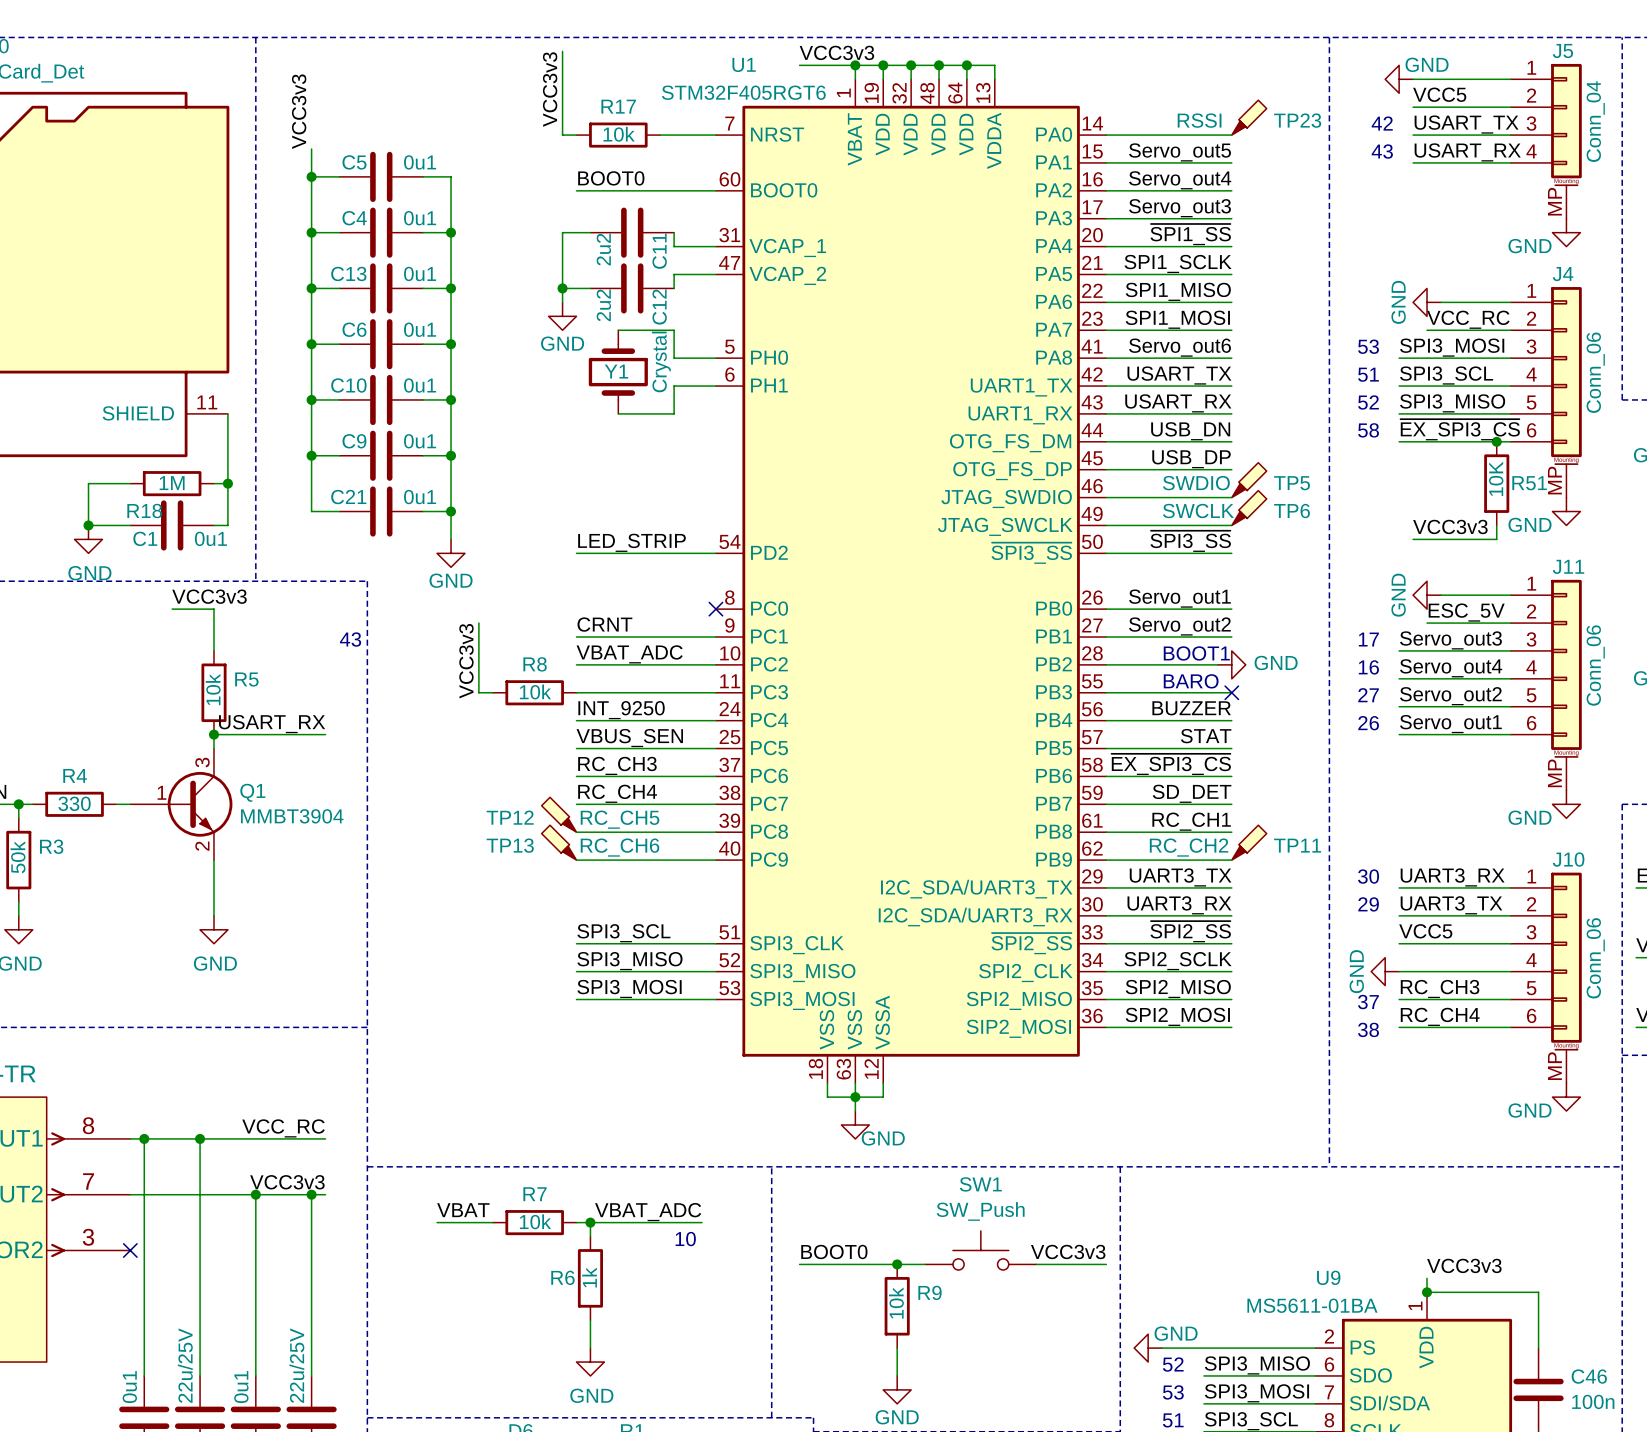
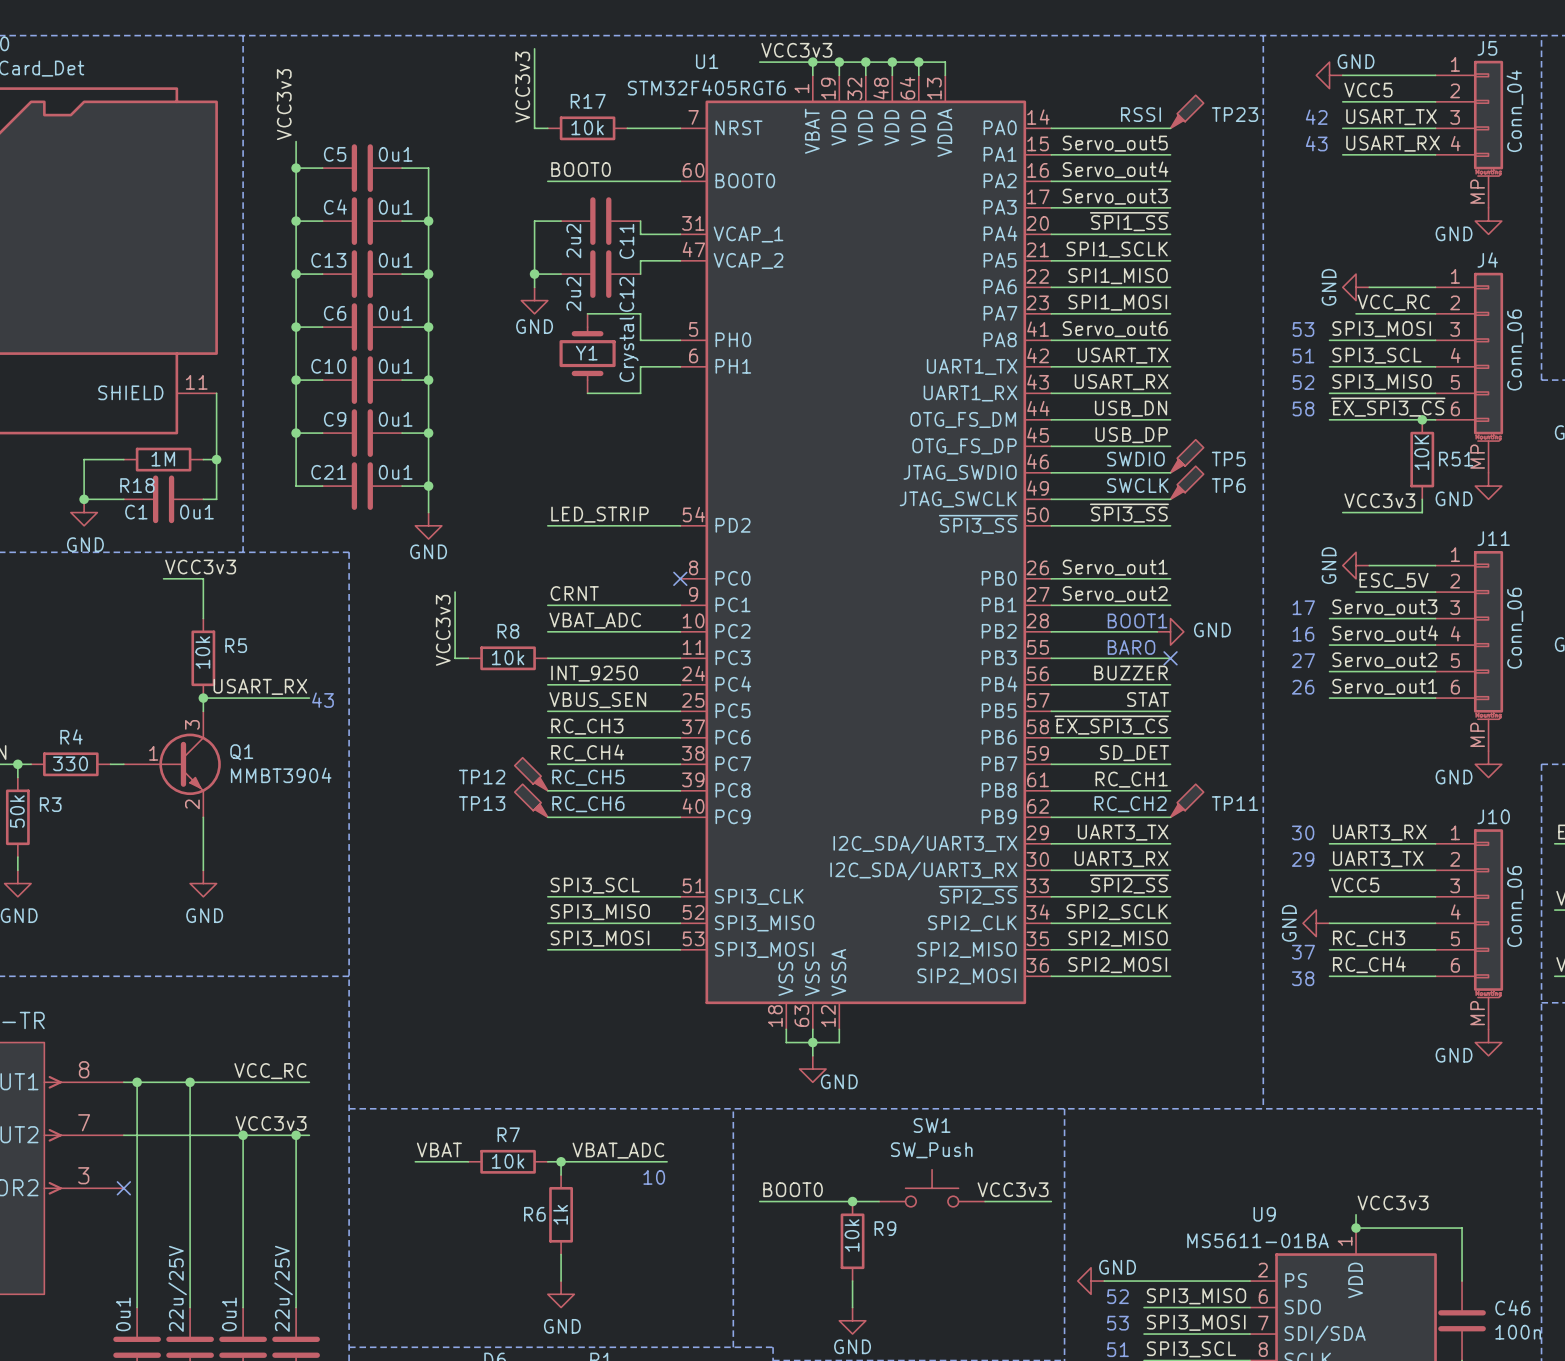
text position: 43 (350, 639) -> 43 (323, 700)

